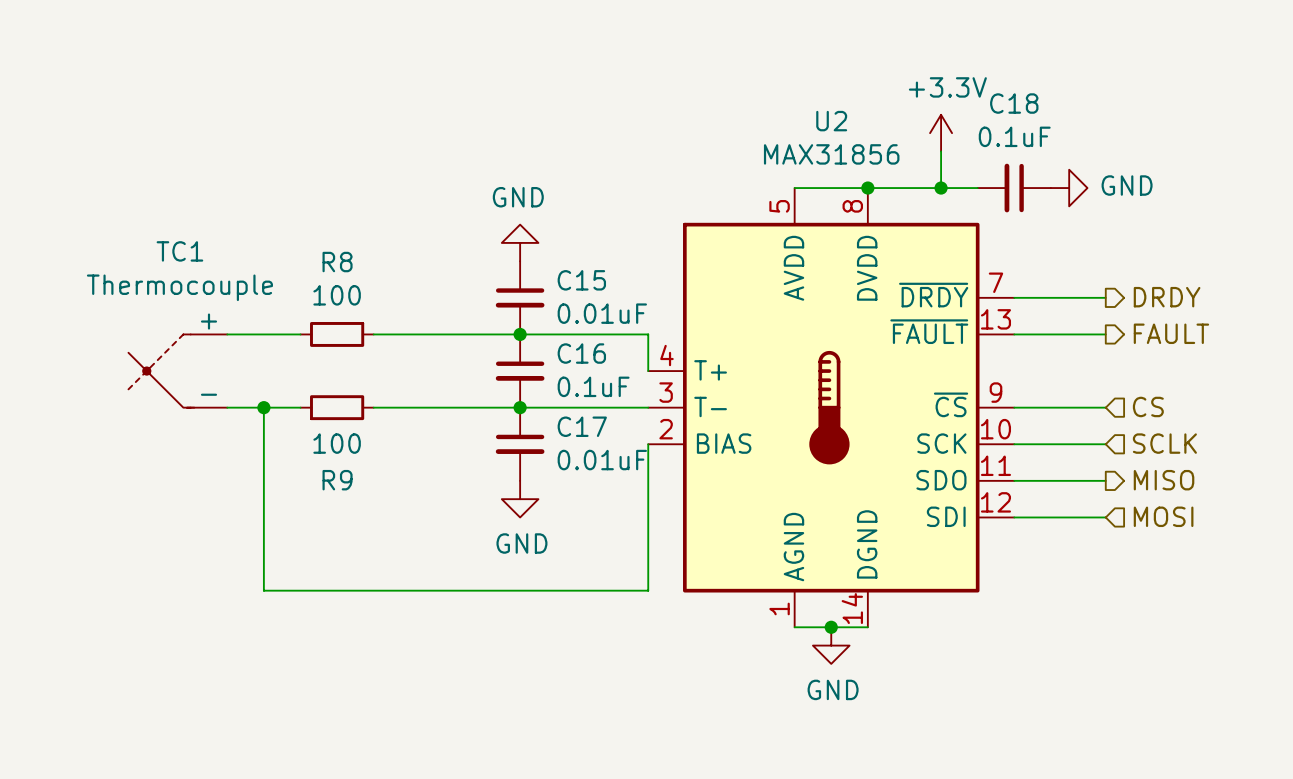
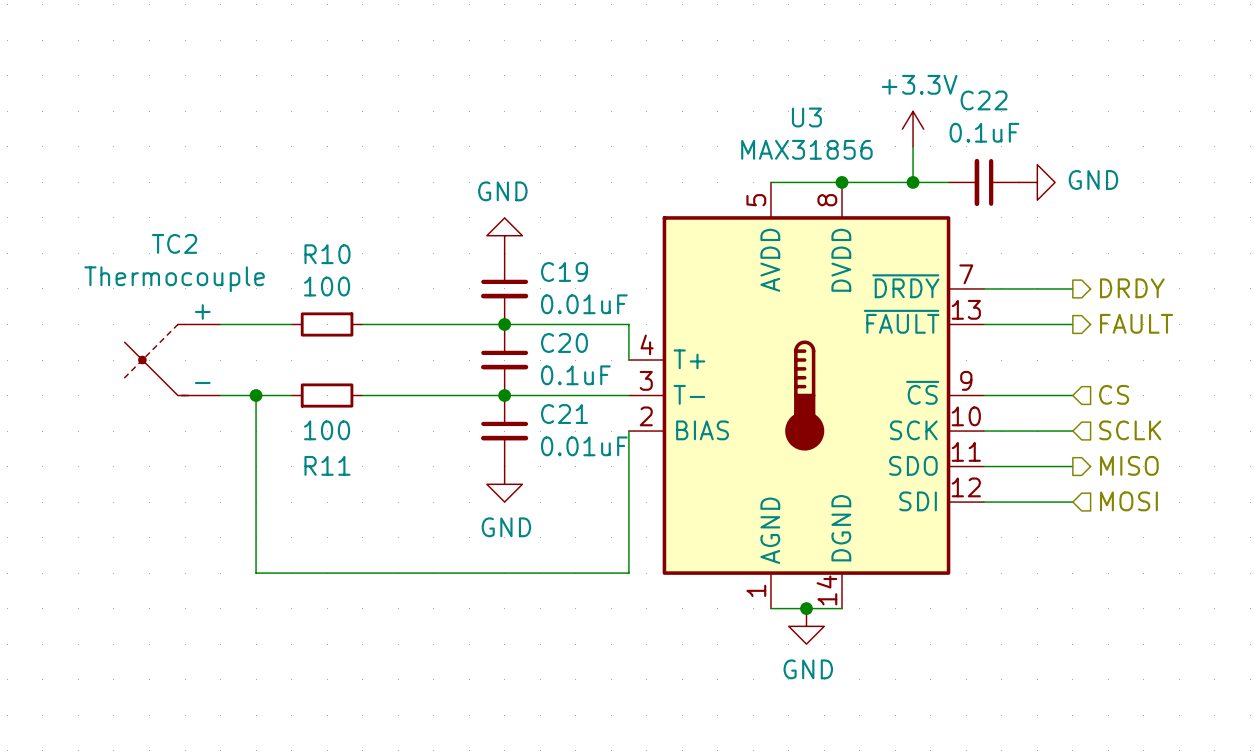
C18 name: C18 (1014, 103) -> C22 (984, 100)
U2 name: U2 (831, 121) -> U3 (806, 117)
TC1 name: TC1 (179, 251) -> TC2 (174, 243)
R8 name: R8 (337, 262) -> R10 (327, 254)
C15 name: C15 (581, 280) -> C19 (564, 271)
C16 name: C16 (581, 353) -> C20 (564, 343)
C17 name: C17 (582, 426) -> C21 (564, 414)
R9 name: R9 (337, 480) -> R11 (327, 465)

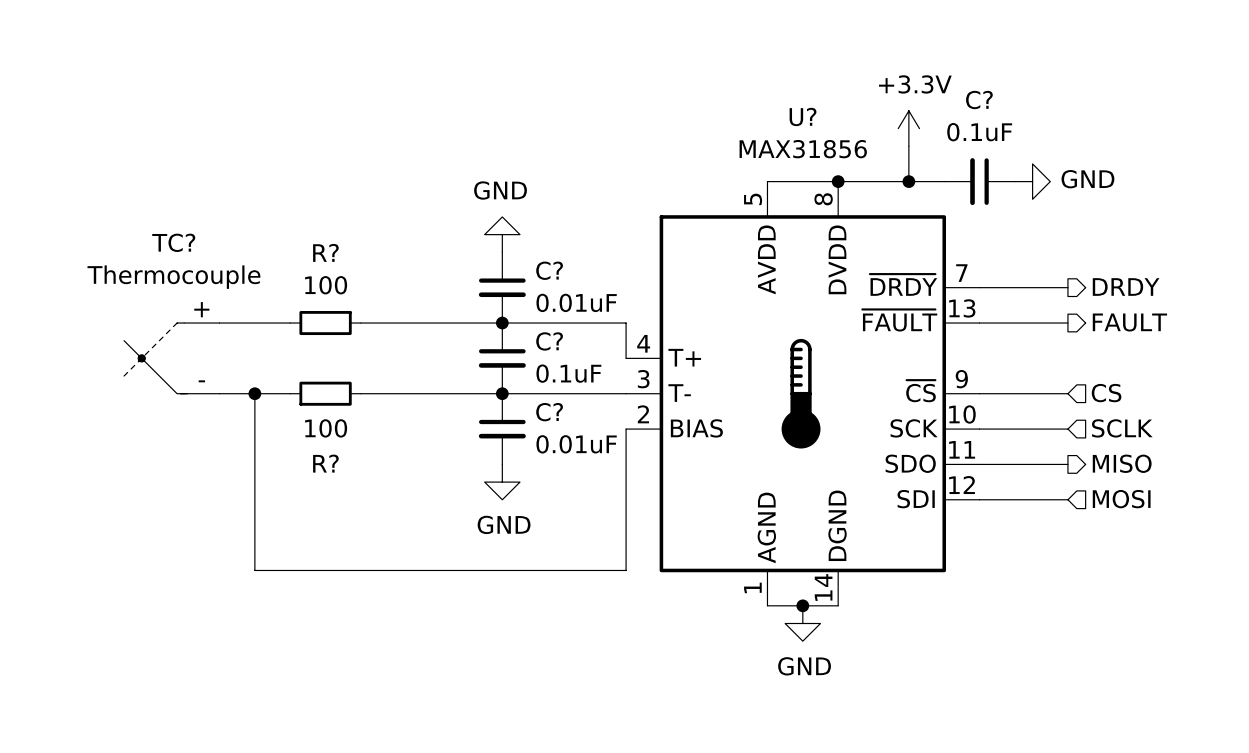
C22 name: C22 (984, 100) -> C? (979, 100)
U3 name: U3 (806, 117) -> U? (803, 116)
TC2 name: TC2 (174, 243) -> TC? (173, 242)
R10 name: R10 (327, 254) -> R? (325, 252)
C19 name: C19 (564, 271) -> C? (549, 270)
C20 name: C20 (564, 343) -> C? (549, 341)
C21 name: C21 (564, 414) -> C? (549, 412)
R11 name: R11 (327, 465) -> R? (325, 463)

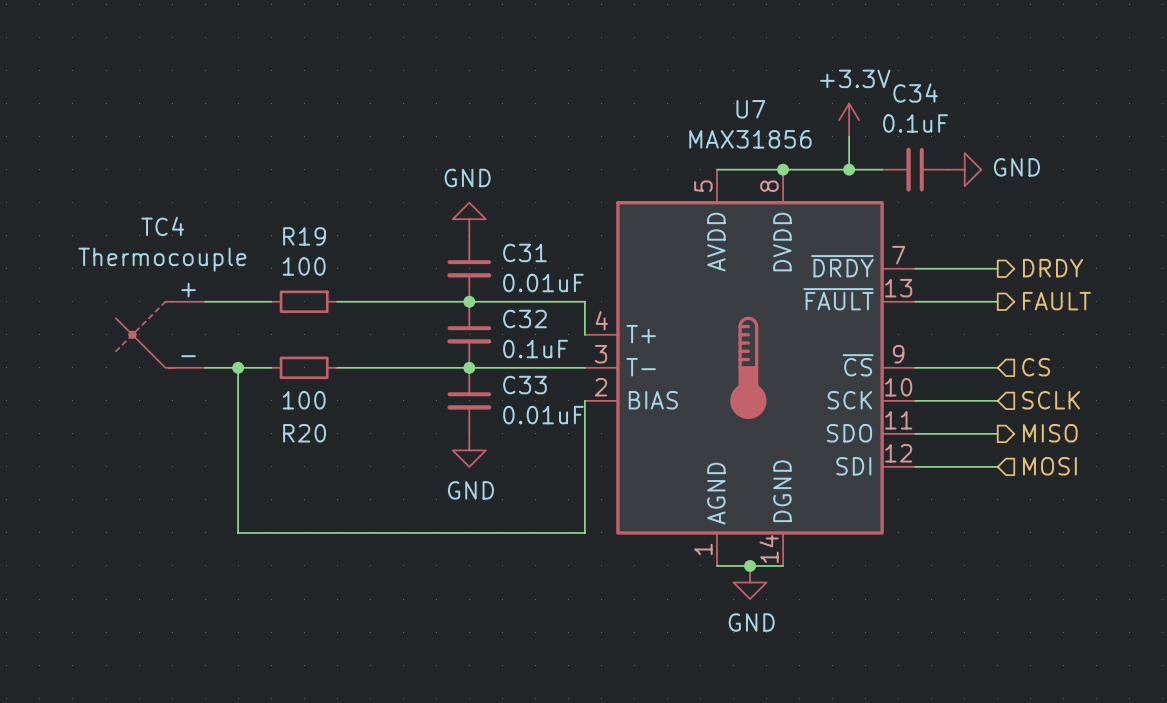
C? name: C? (979, 100) -> C34 (915, 93)
U? name: U? (803, 116) -> U7 (750, 109)
TC? name: TC? (173, 242) -> TC4 (162, 226)
R? name: R? (325, 252) -> R19 (304, 236)
C? name: C? (549, 270) -> C31 (524, 252)
C? name: C? (549, 341) -> C32 (524, 318)
C? name: C? (549, 412) -> C33 (524, 385)
R? name: R? (325, 463) -> R20 (304, 433)

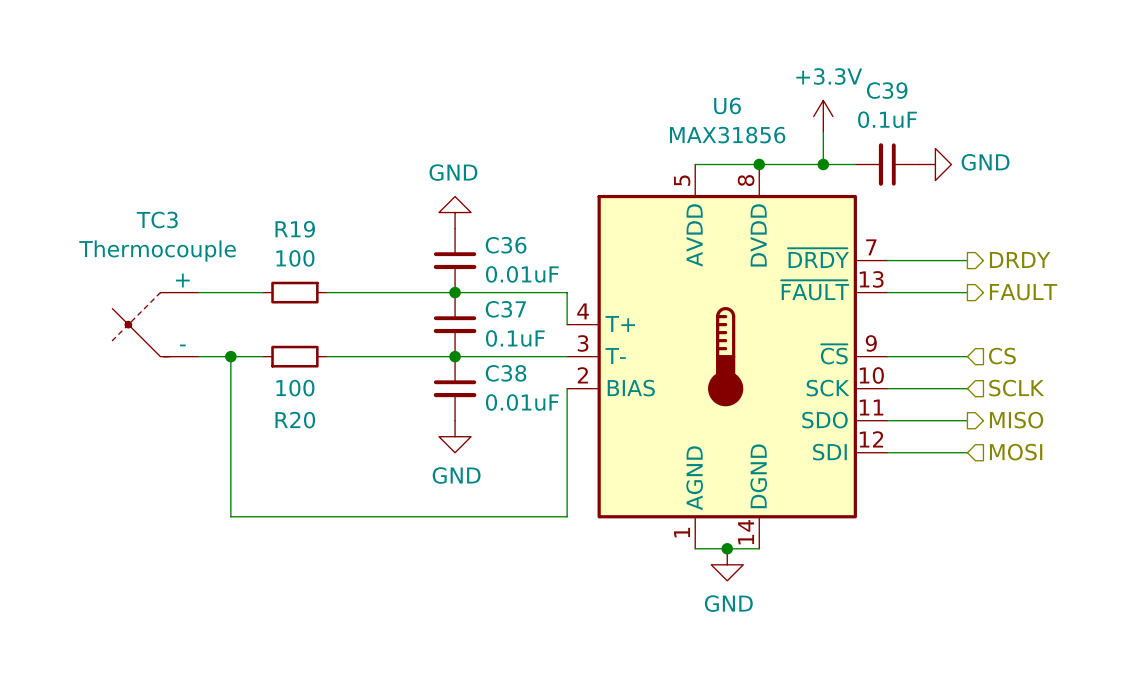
C34 name: C34 (915, 93) -> C39 (887, 90)
U7 name: U7 (750, 109) -> U6 (727, 105)
TC4 name: TC4 (162, 226) -> TC3 (157, 219)
C31 name: C31 (524, 252) -> C36 (506, 245)
C32 name: C32 (524, 318) -> C37 (505, 309)
C33 name: C33 (524, 385) -> C38 (506, 373)

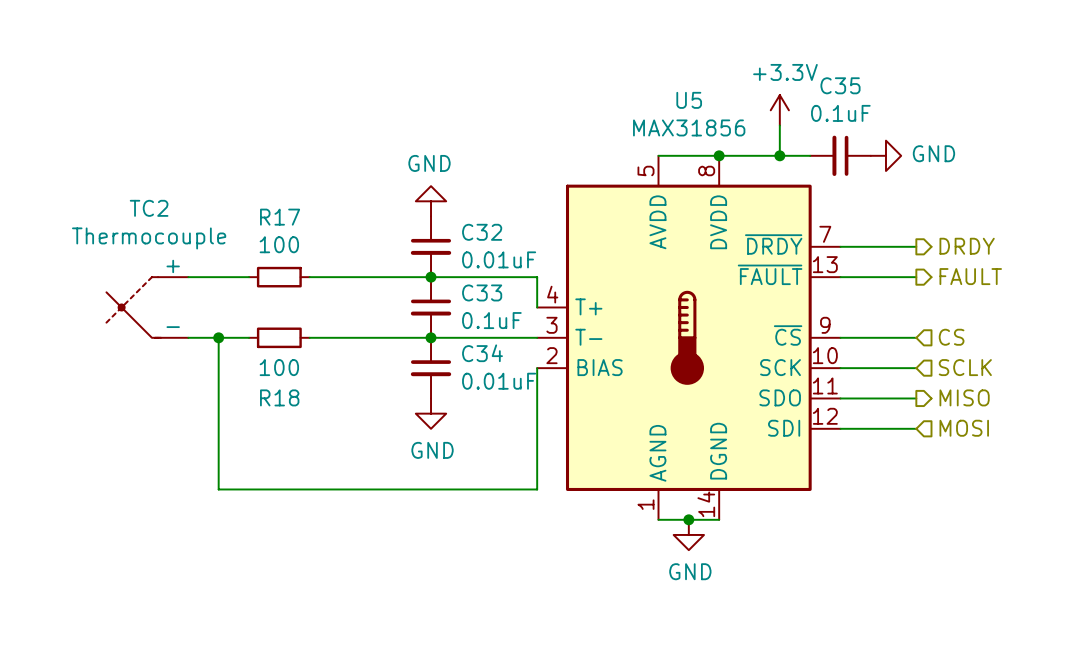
C39 name: C39 (887, 90) -> C35 (840, 85)
U6 name: U6 (727, 105) -> U5 (689, 100)
TC3 name: TC3 (157, 219) -> TC2 (149, 208)
R19 name: R19 (295, 229) -> R17 (280, 217)
C36 name: C36 (506, 245) -> C32 (482, 232)
C37 name: C37 (505, 309) -> C33 (482, 292)
C38 name: C38 (506, 373) -> C34 (482, 353)
R20 name: R20 (295, 420) -> R18 (279, 397)

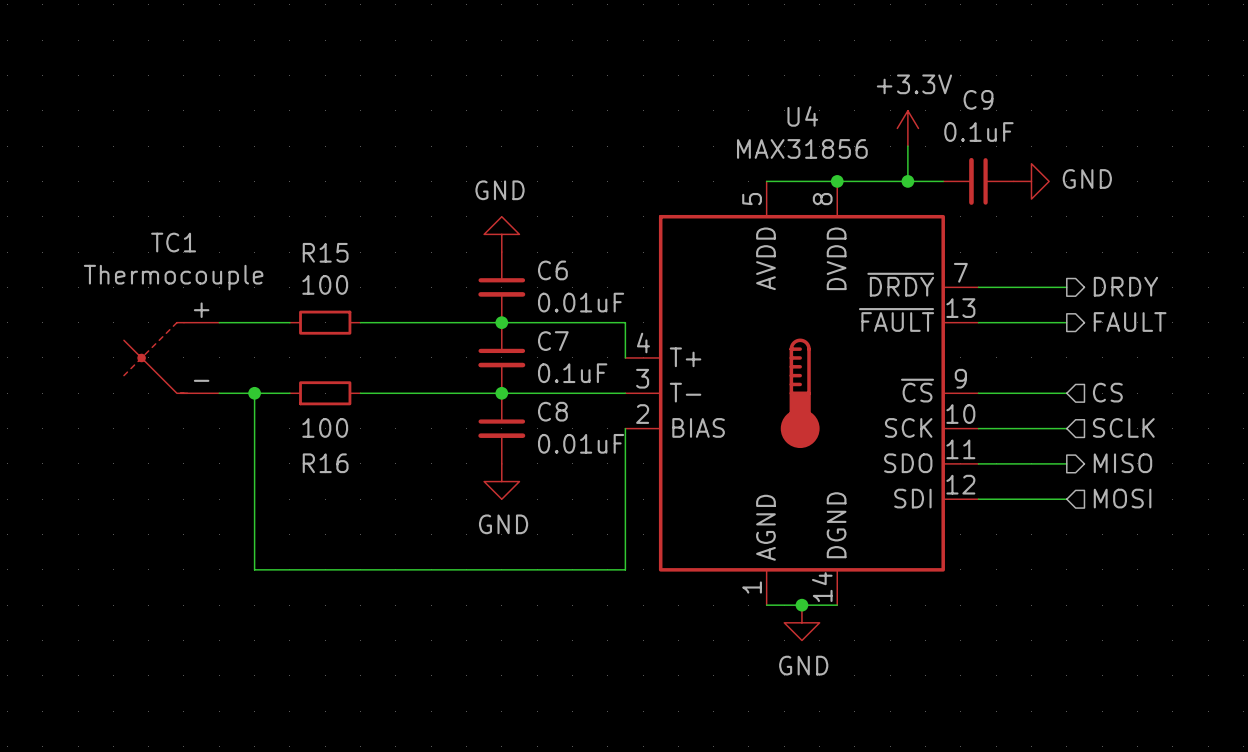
C35 name: C35 (840, 85) -> C9 (978, 99)
U5 name: U5 (689, 100) -> U4 (802, 116)
TC2 name: TC2 (149, 208) -> TC1 (173, 242)
R17 name: R17 (280, 217) -> R15 (325, 252)
C32 name: C32 (482, 232) -> C6 (552, 270)
C33 name: C33 (482, 292) -> C7 (553, 341)
C34 name: C34 (482, 353) -> C8 (552, 411)
R18 name: R18 (279, 397) -> R16 (325, 463)

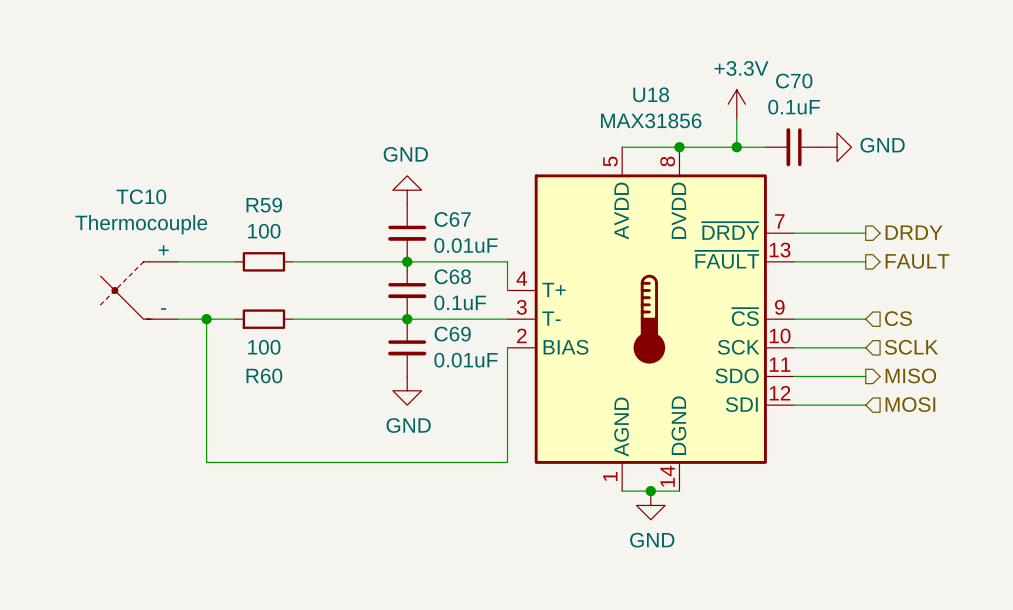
C9 name: C9 (978, 99) -> C70 (794, 81)
U4 name: U4 (802, 116) -> U18 (651, 94)
TC1 name: TC1 (173, 242) -> TC10 (141, 196)
R15 name: R15 (325, 252) -> R59 (264, 205)
C6 name: C6 (552, 270) -> C67 (452, 219)
C7 name: C7 (553, 341) -> C68 (452, 276)
C8 name: C8 (552, 411) -> C69 (452, 334)
R16 name: R16 (325, 463) -> R60 (264, 375)

